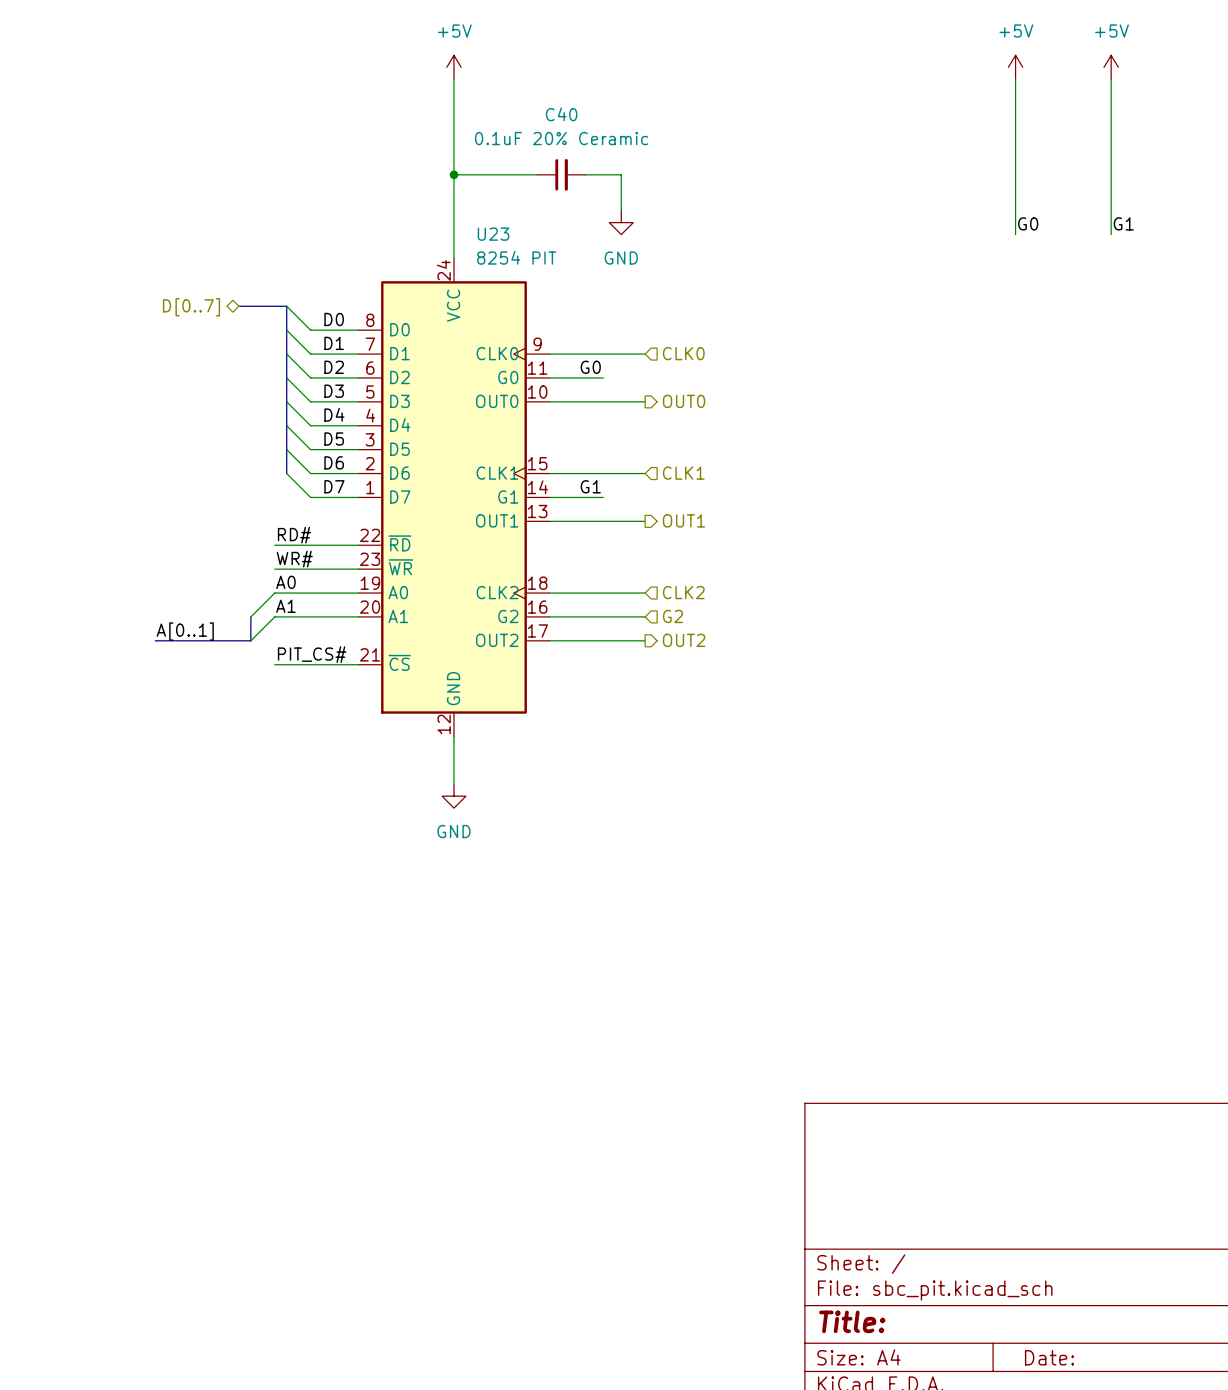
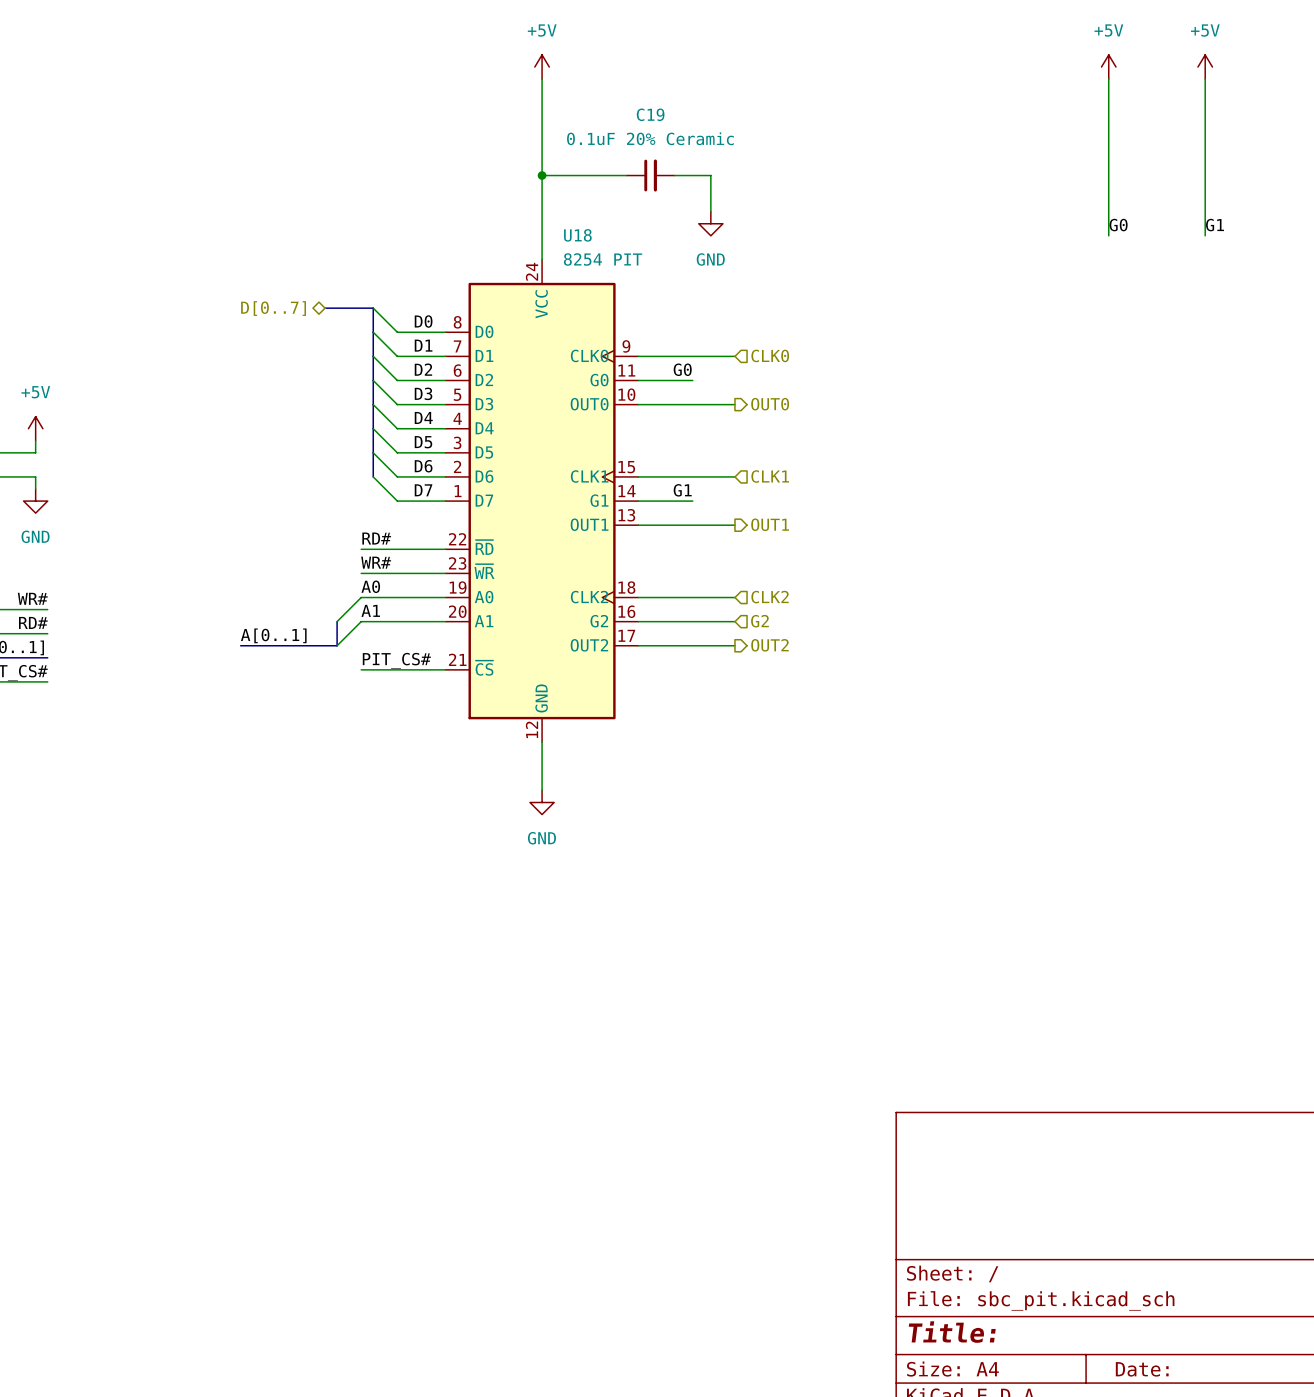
C40 name: C40 (561, 114) -> C19 (650, 114)
U23 name: U23 (493, 234) -> U18 (577, 235)

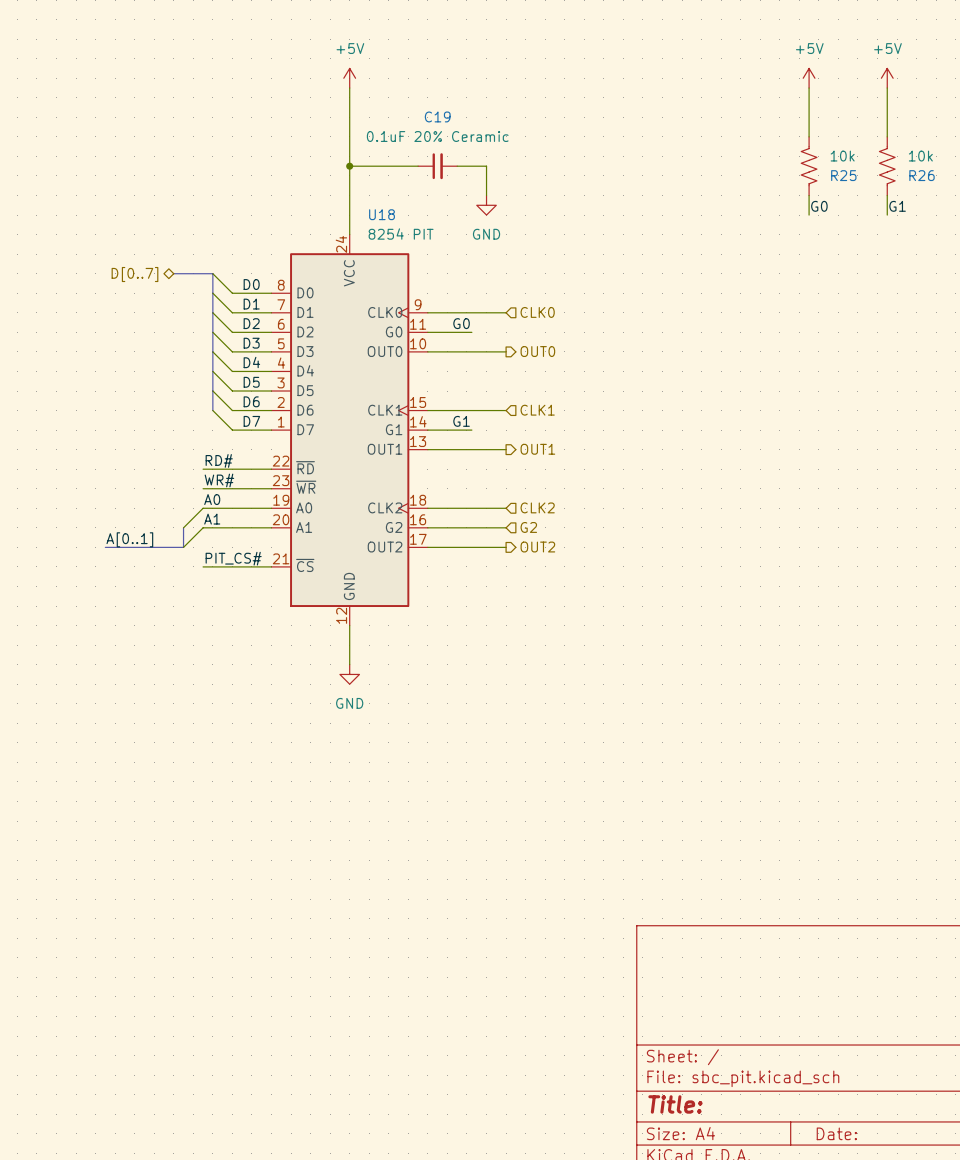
R25: none -> 10k (809, 166)
R26: none -> 10k (887, 166)

